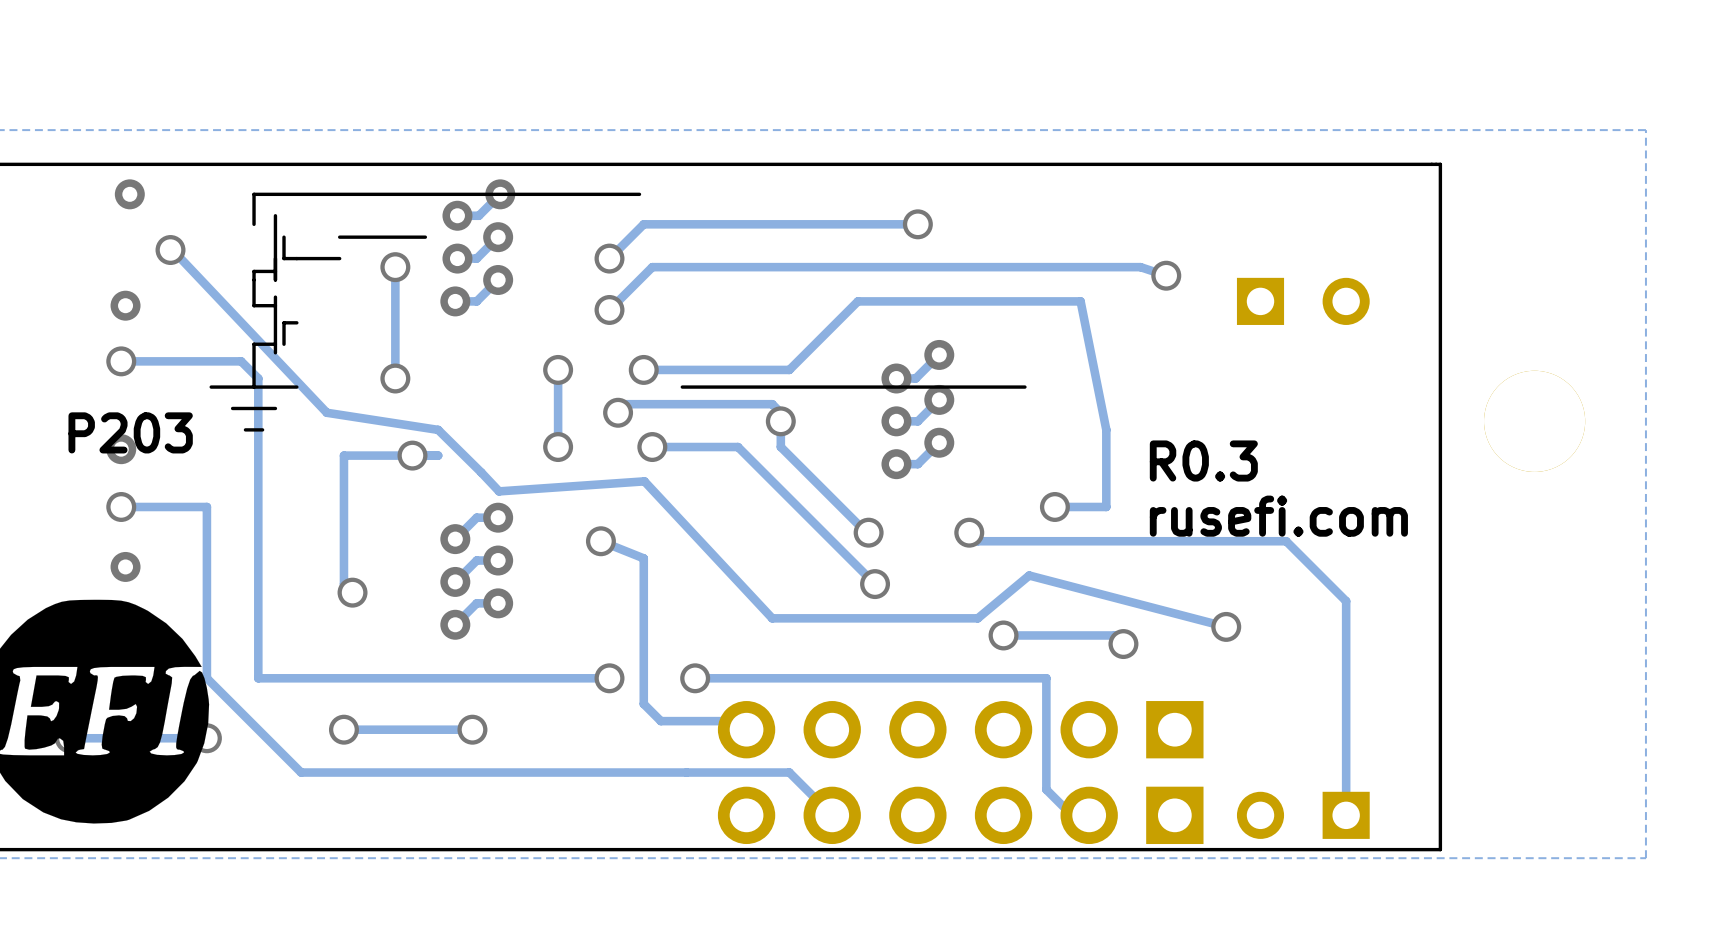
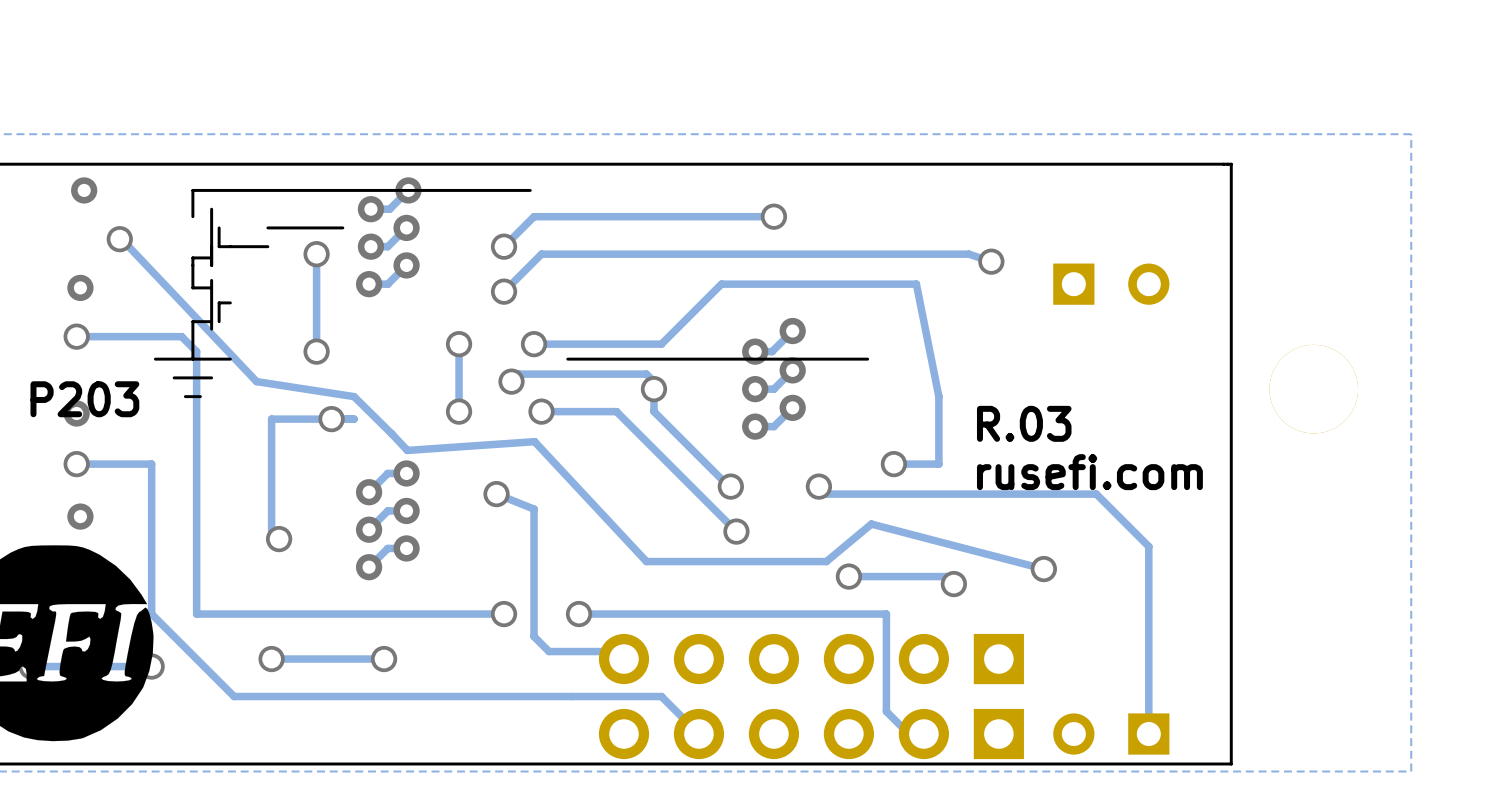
text: R0.3 (1203, 460) -> R.03 (1024, 423)

